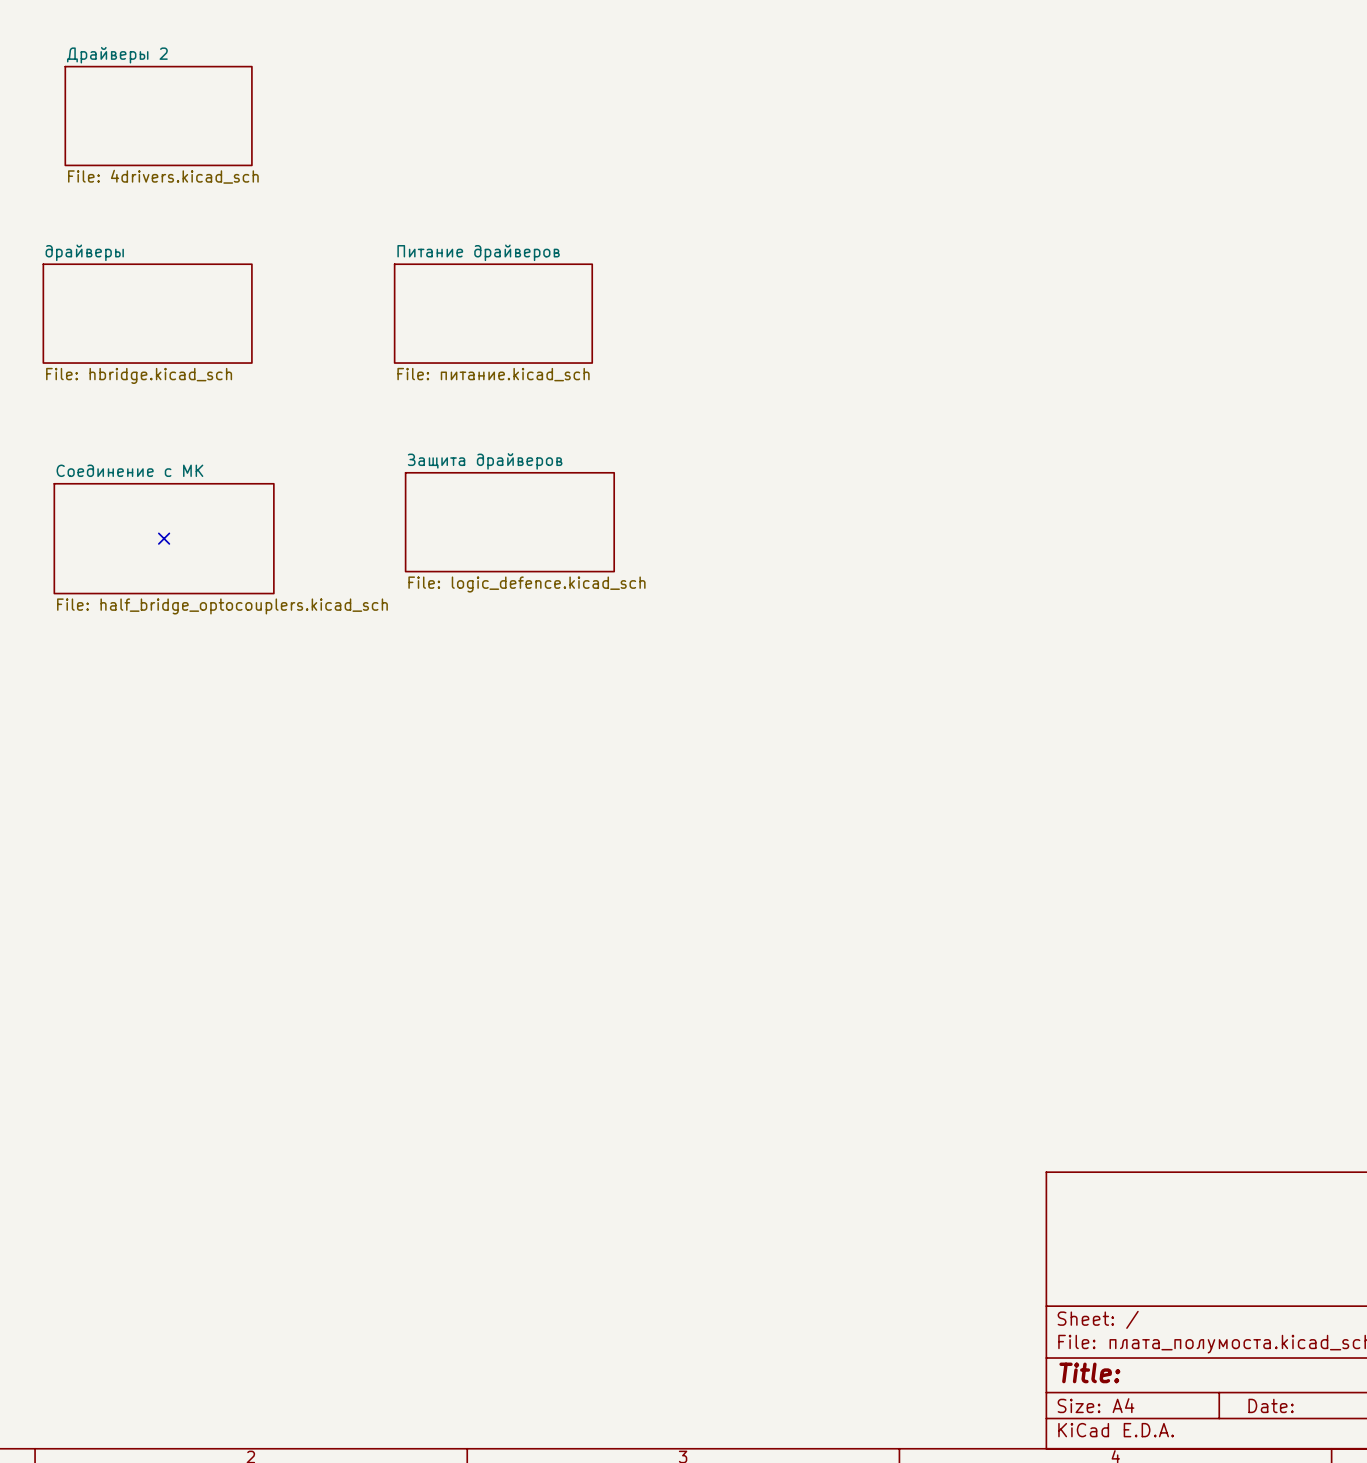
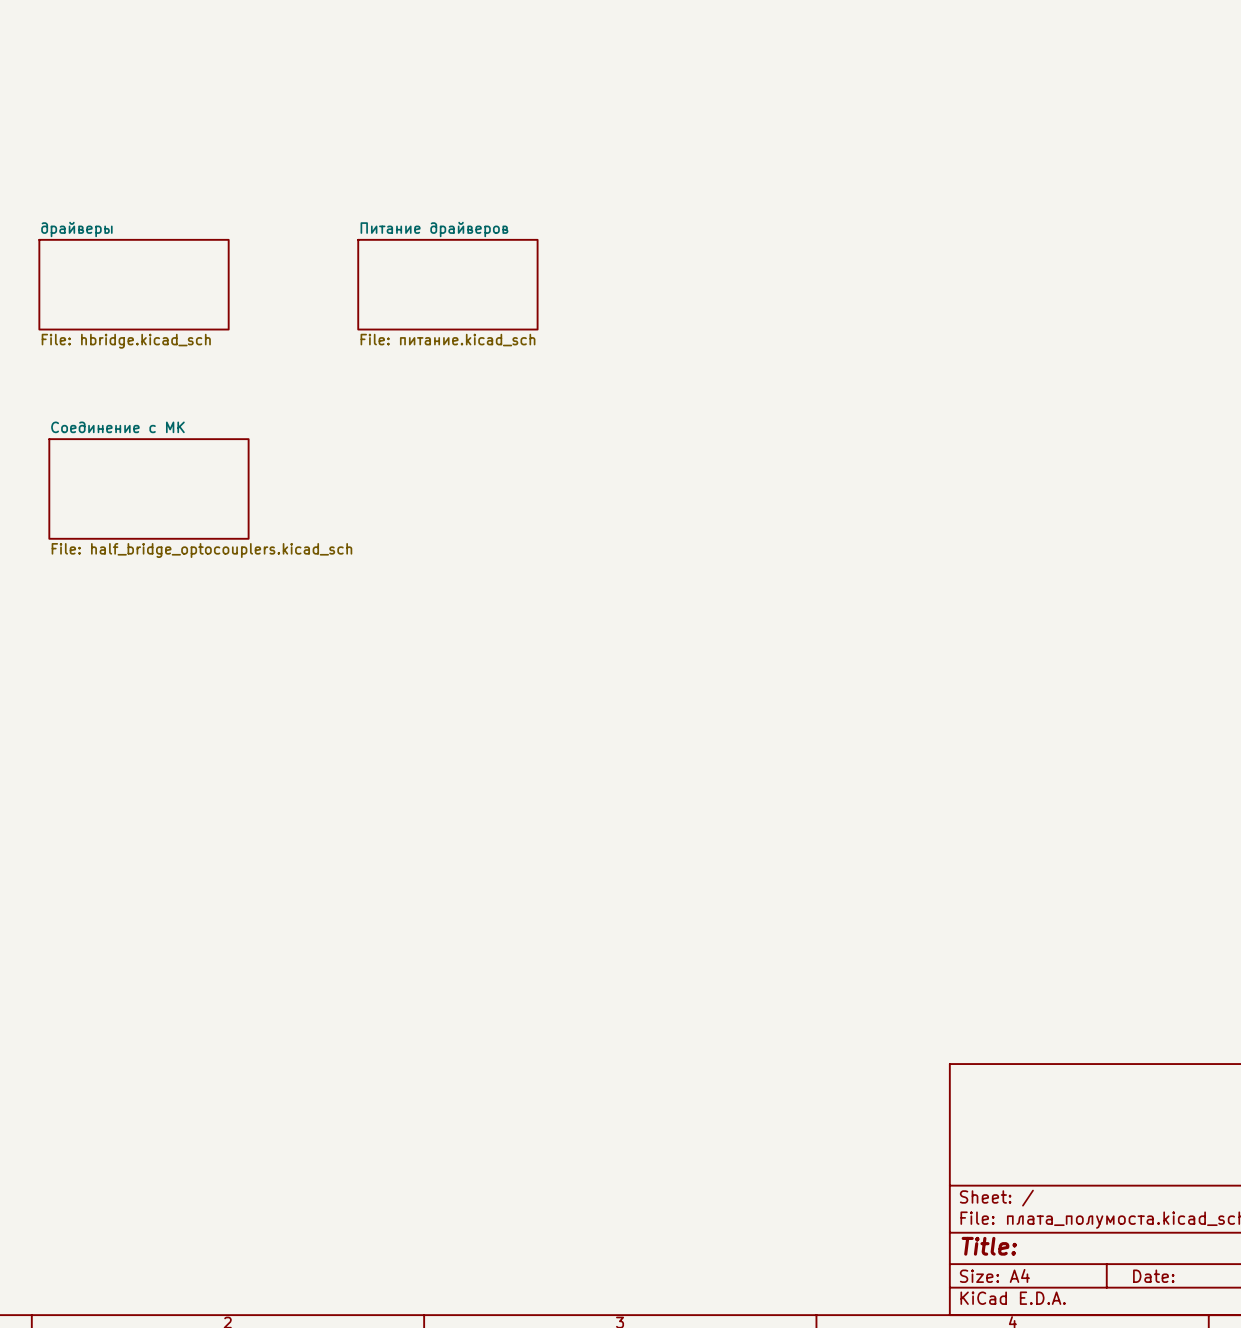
sheet Драйверы 2: File: 4drivers.kicad_sch (158, 116) -> none
sheet Защита драйверов: File: logic_defence.kicad_sch (509, 522) -> none
no-connect mark: (164, 538) -> none

